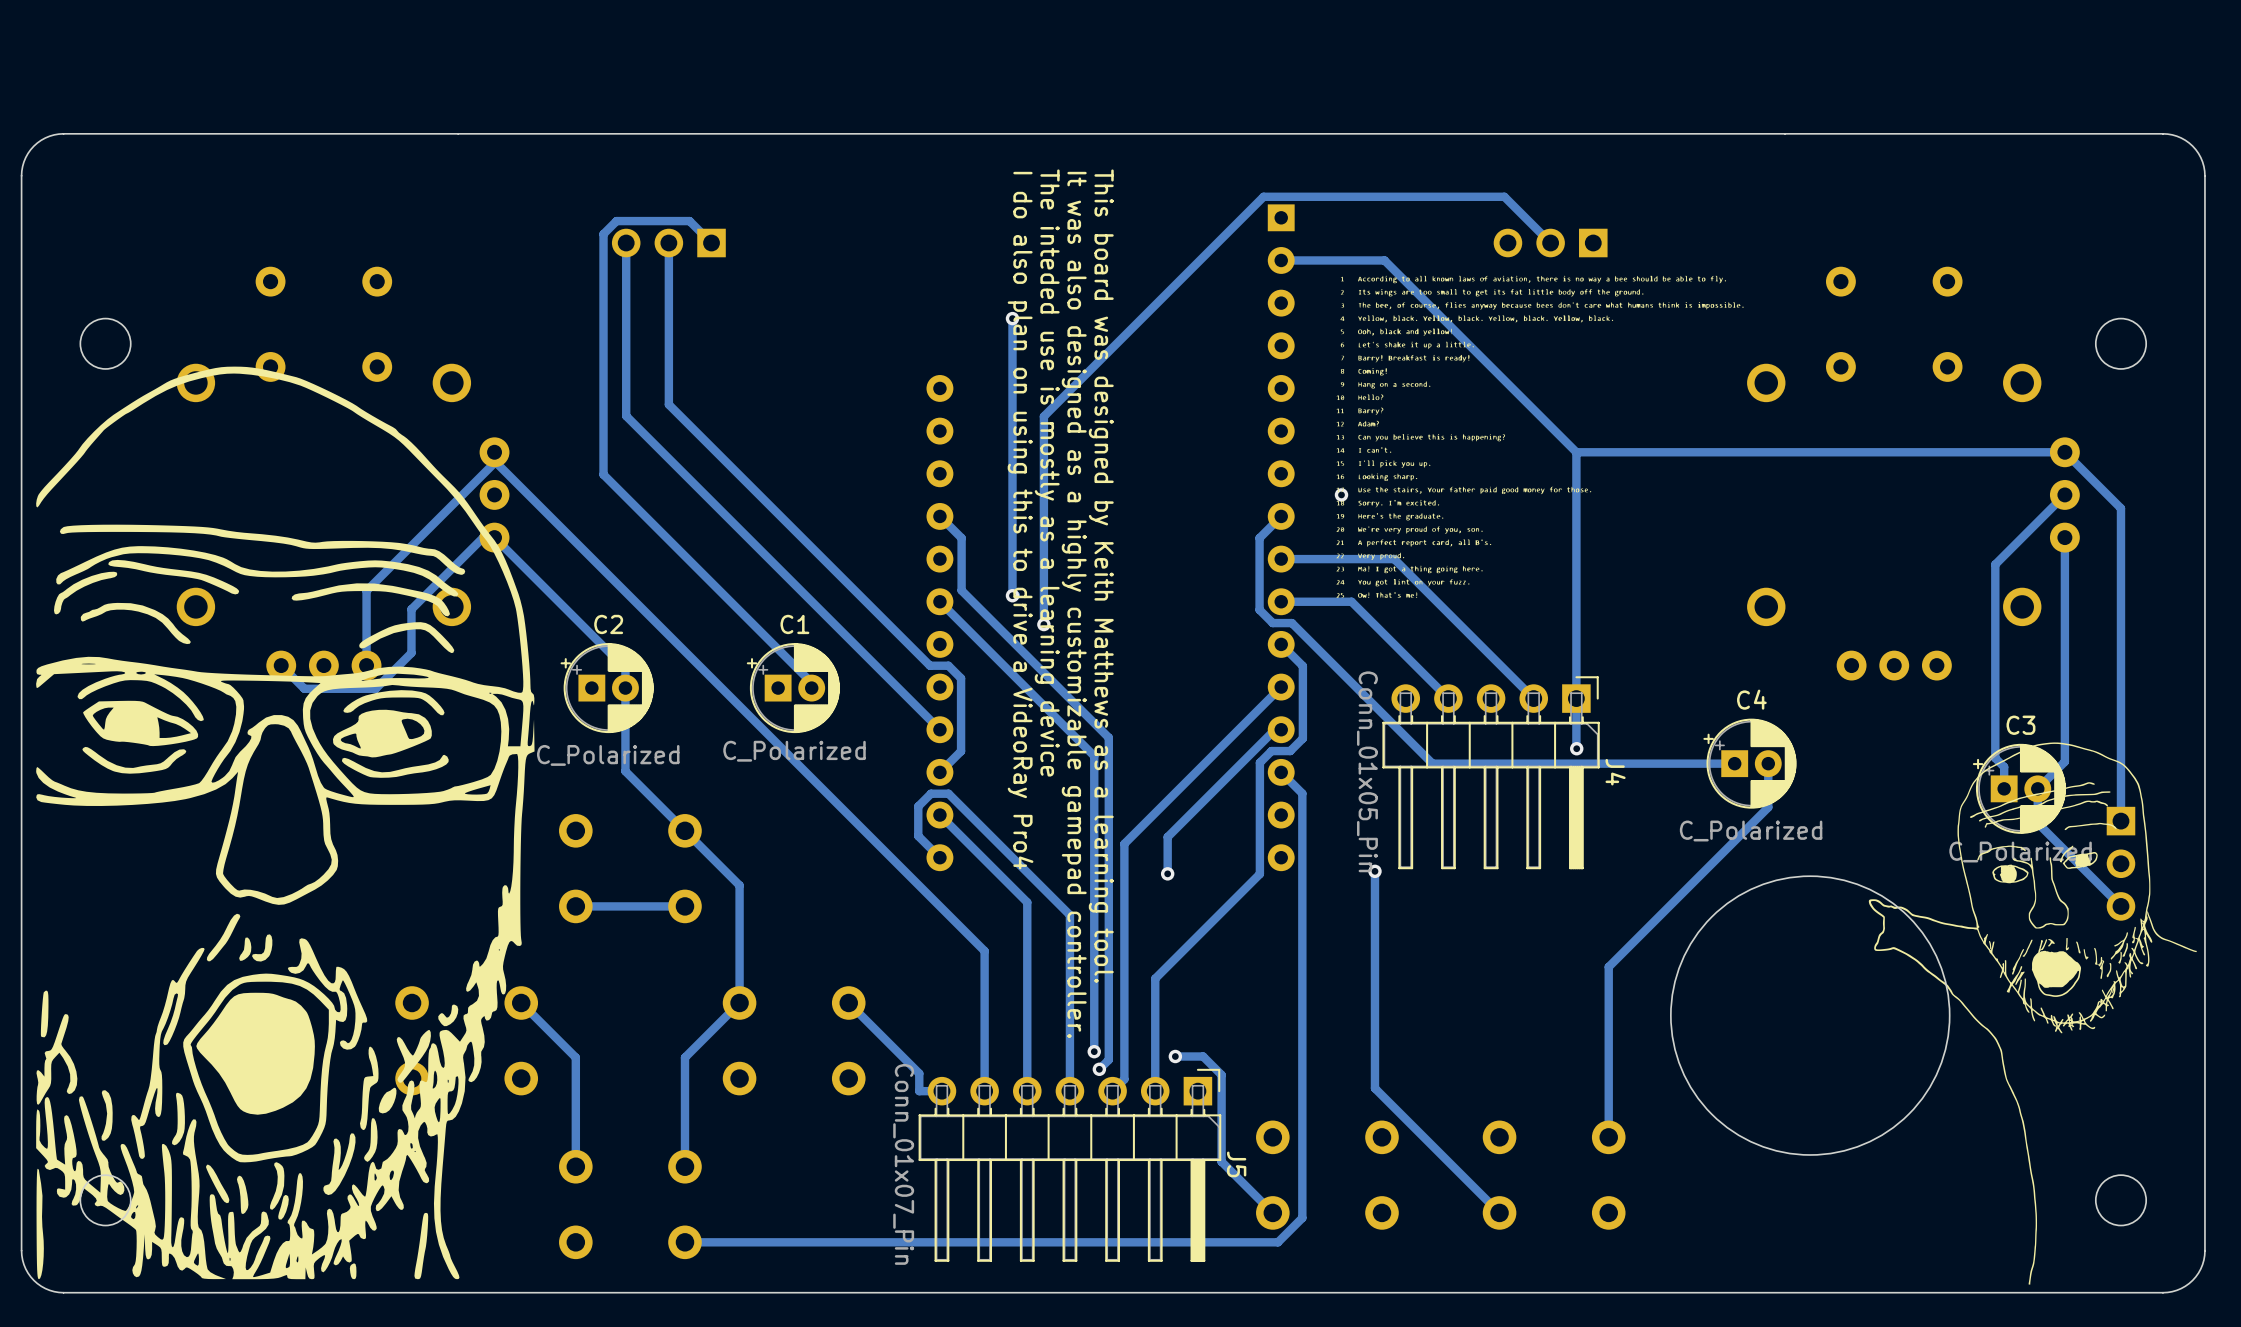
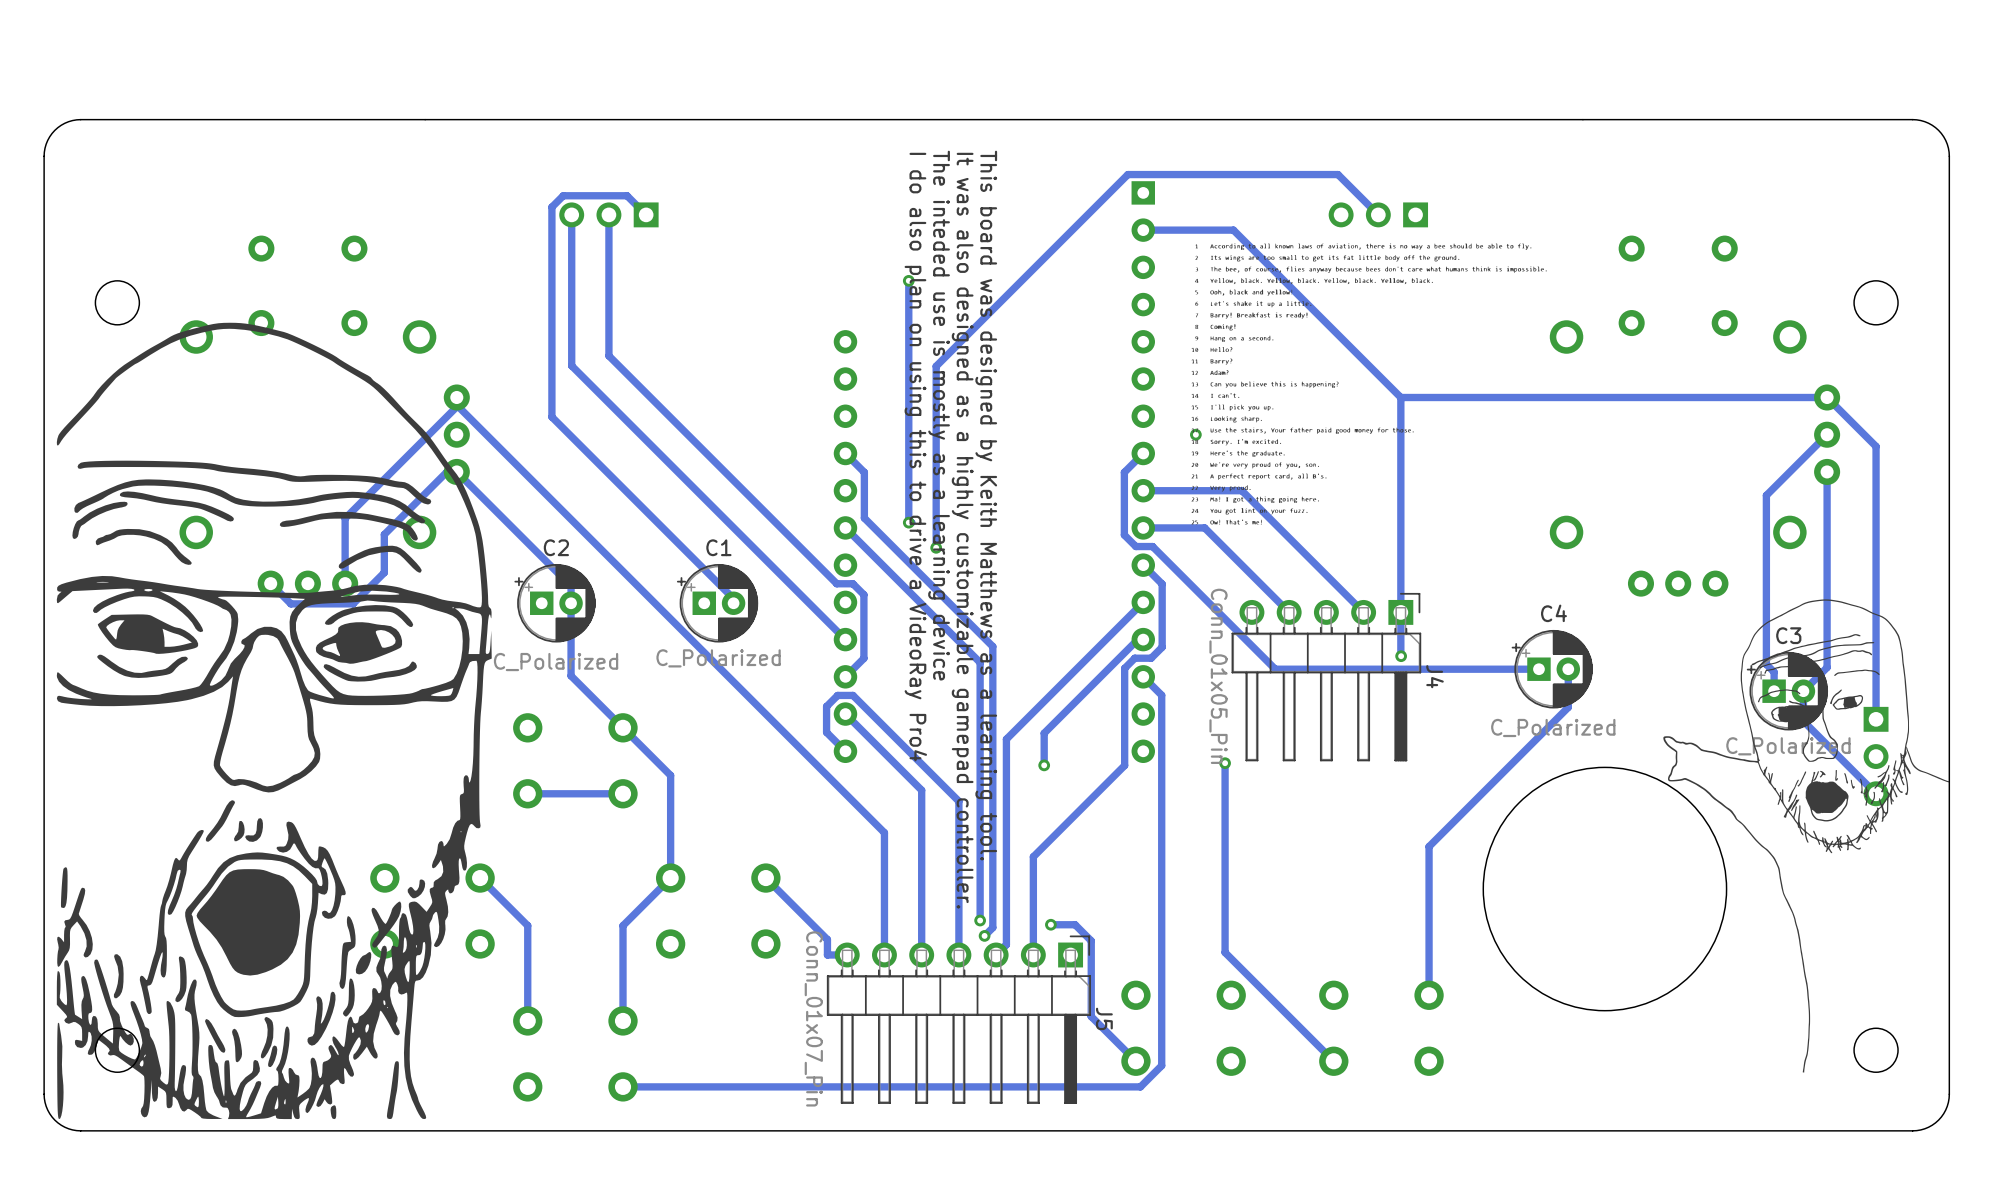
drawing position: (2032, 1013) -> (1806, 835)

